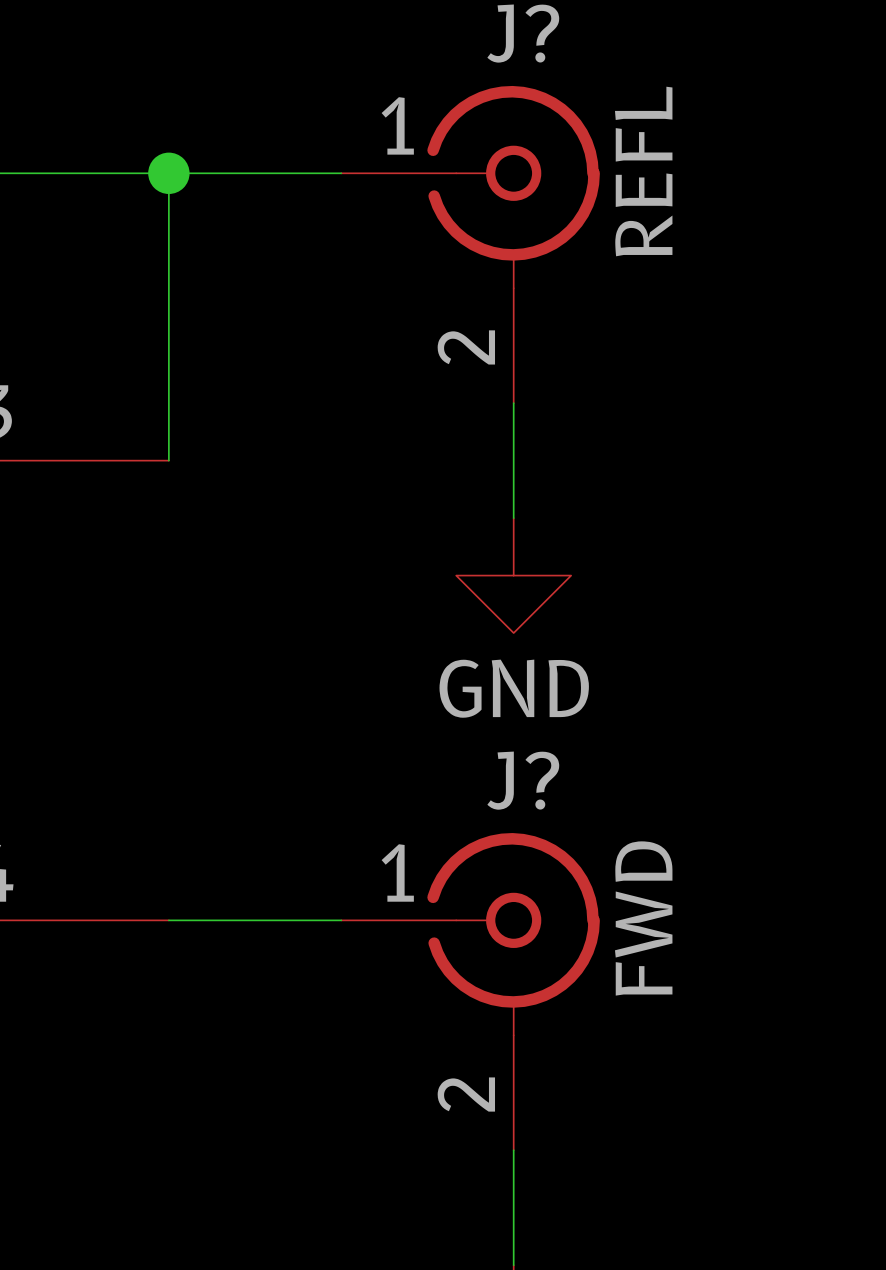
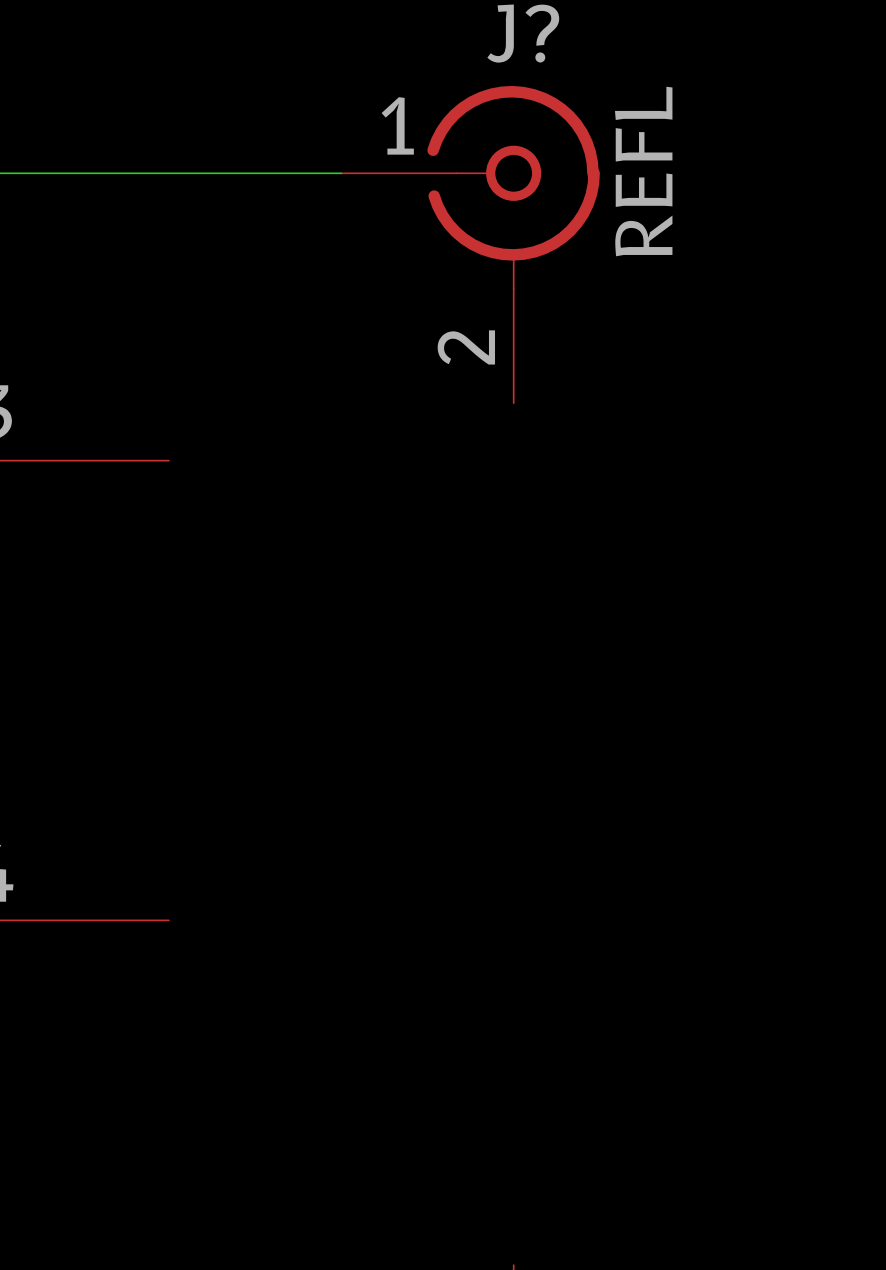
wire: (168, 173) (168, 460) -> none
junction: (168, 173) -> none
wire: (513, 403) (513, 518) -> none
power symbol: GND (513, 575) -> none
wire: (168, 920) (341, 920) -> none
J?: FWD (470, 991) -> none
wire: (513, 1150) (513, 1265) -> none

